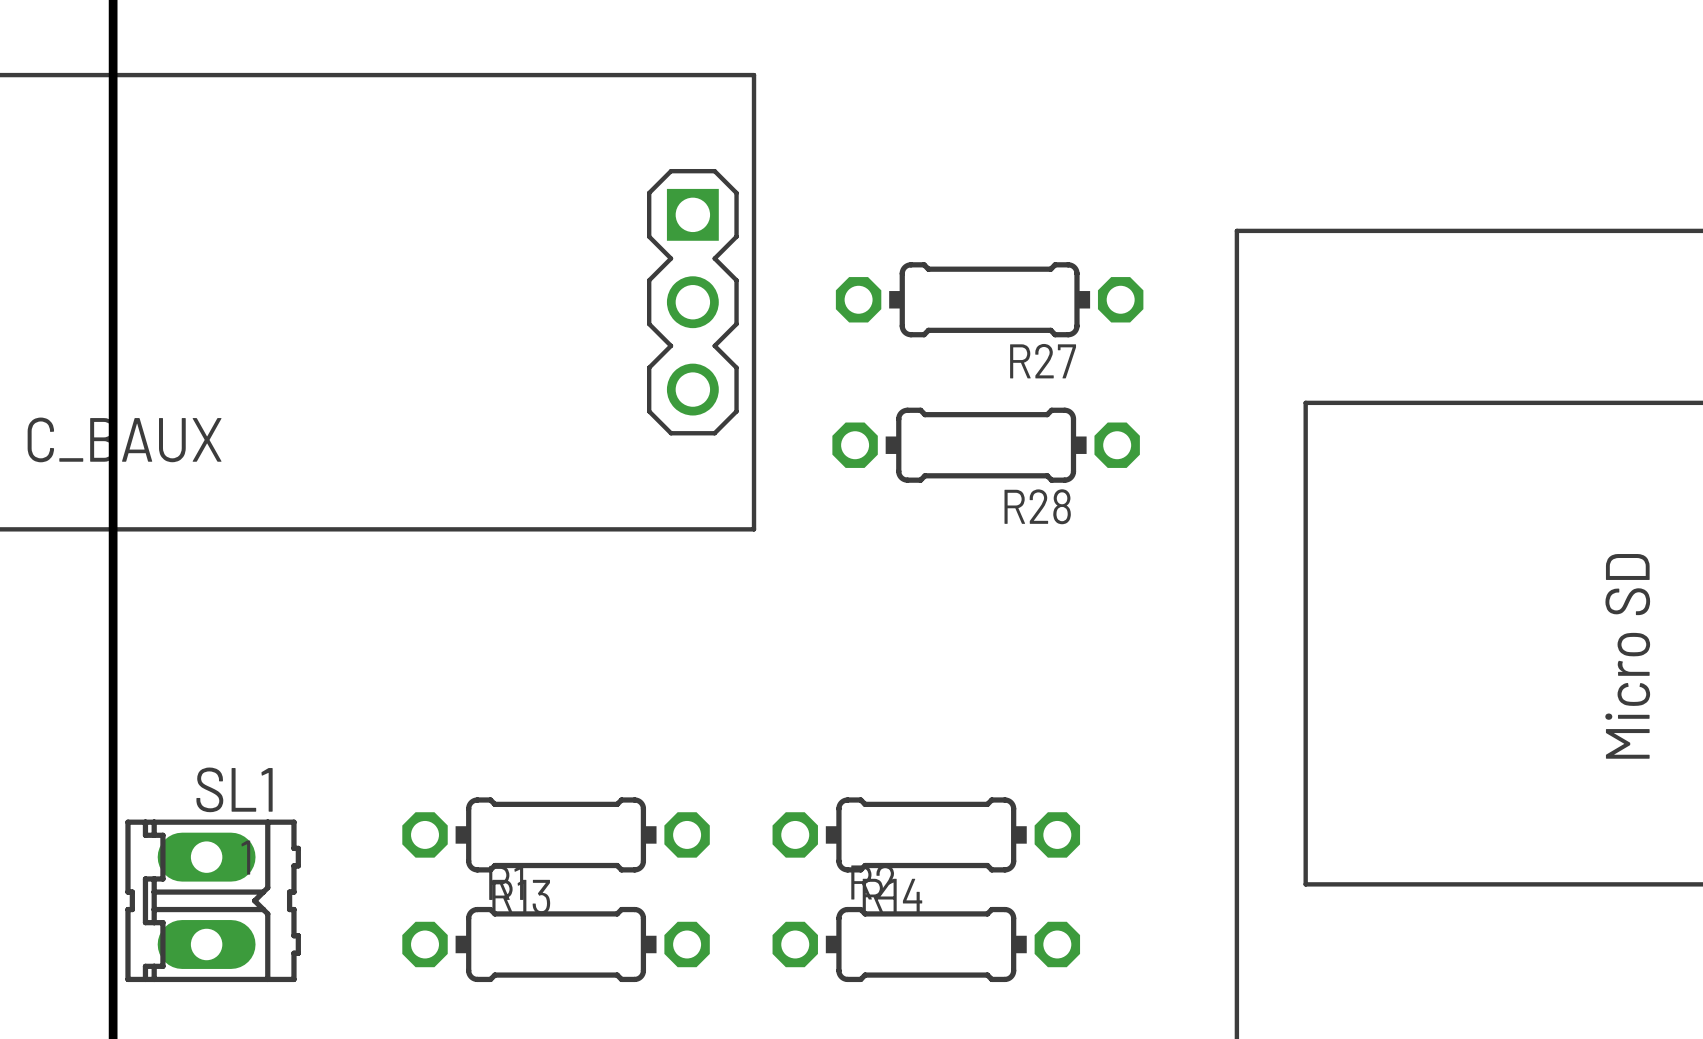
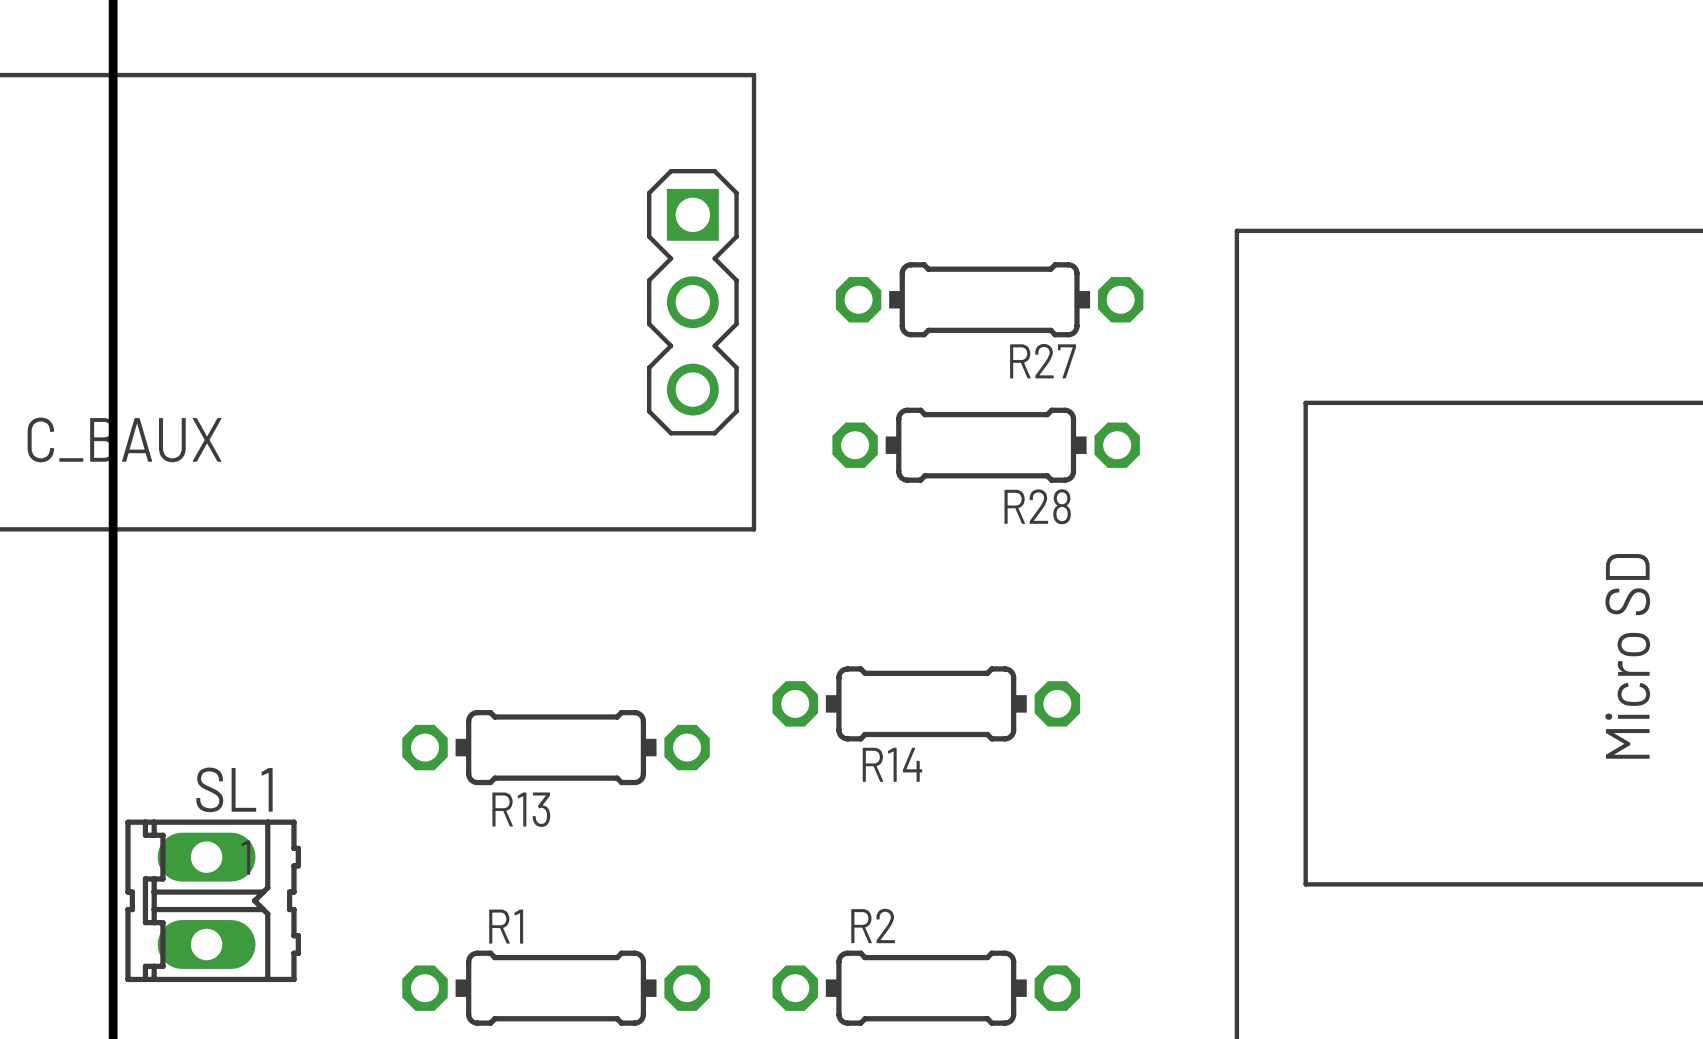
R13 position: (556, 834) -> (556, 747)
R14 position: (926, 834) -> (926, 703)
R1 position: (556, 944) -> (556, 988)
R2 position: (926, 944) -> (926, 988)

